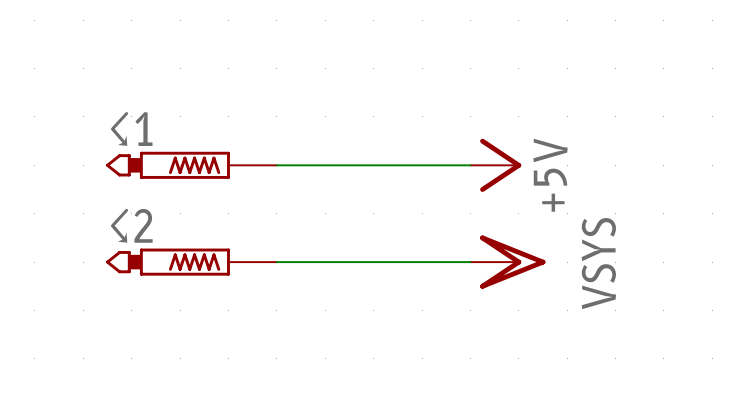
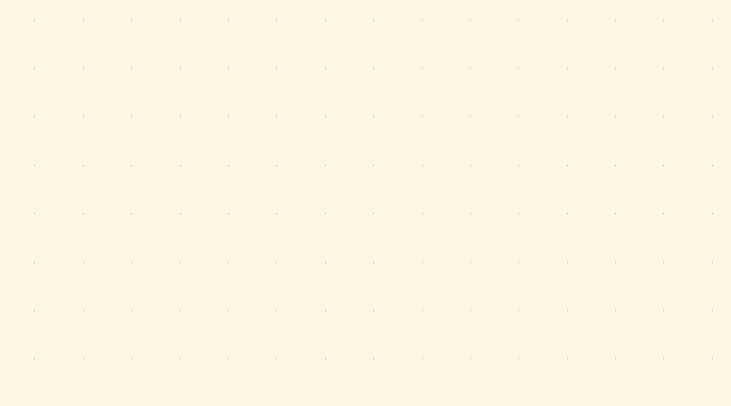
☇1: (191, 165) -> none
wire: (276, 165) (470, 165) -> none
power symbol: +5V (495, 165) -> none
☇2: (191, 262) -> none
wire: (276, 262) (470, 262) -> none
power symbol: VSYS (507, 262) -> none

